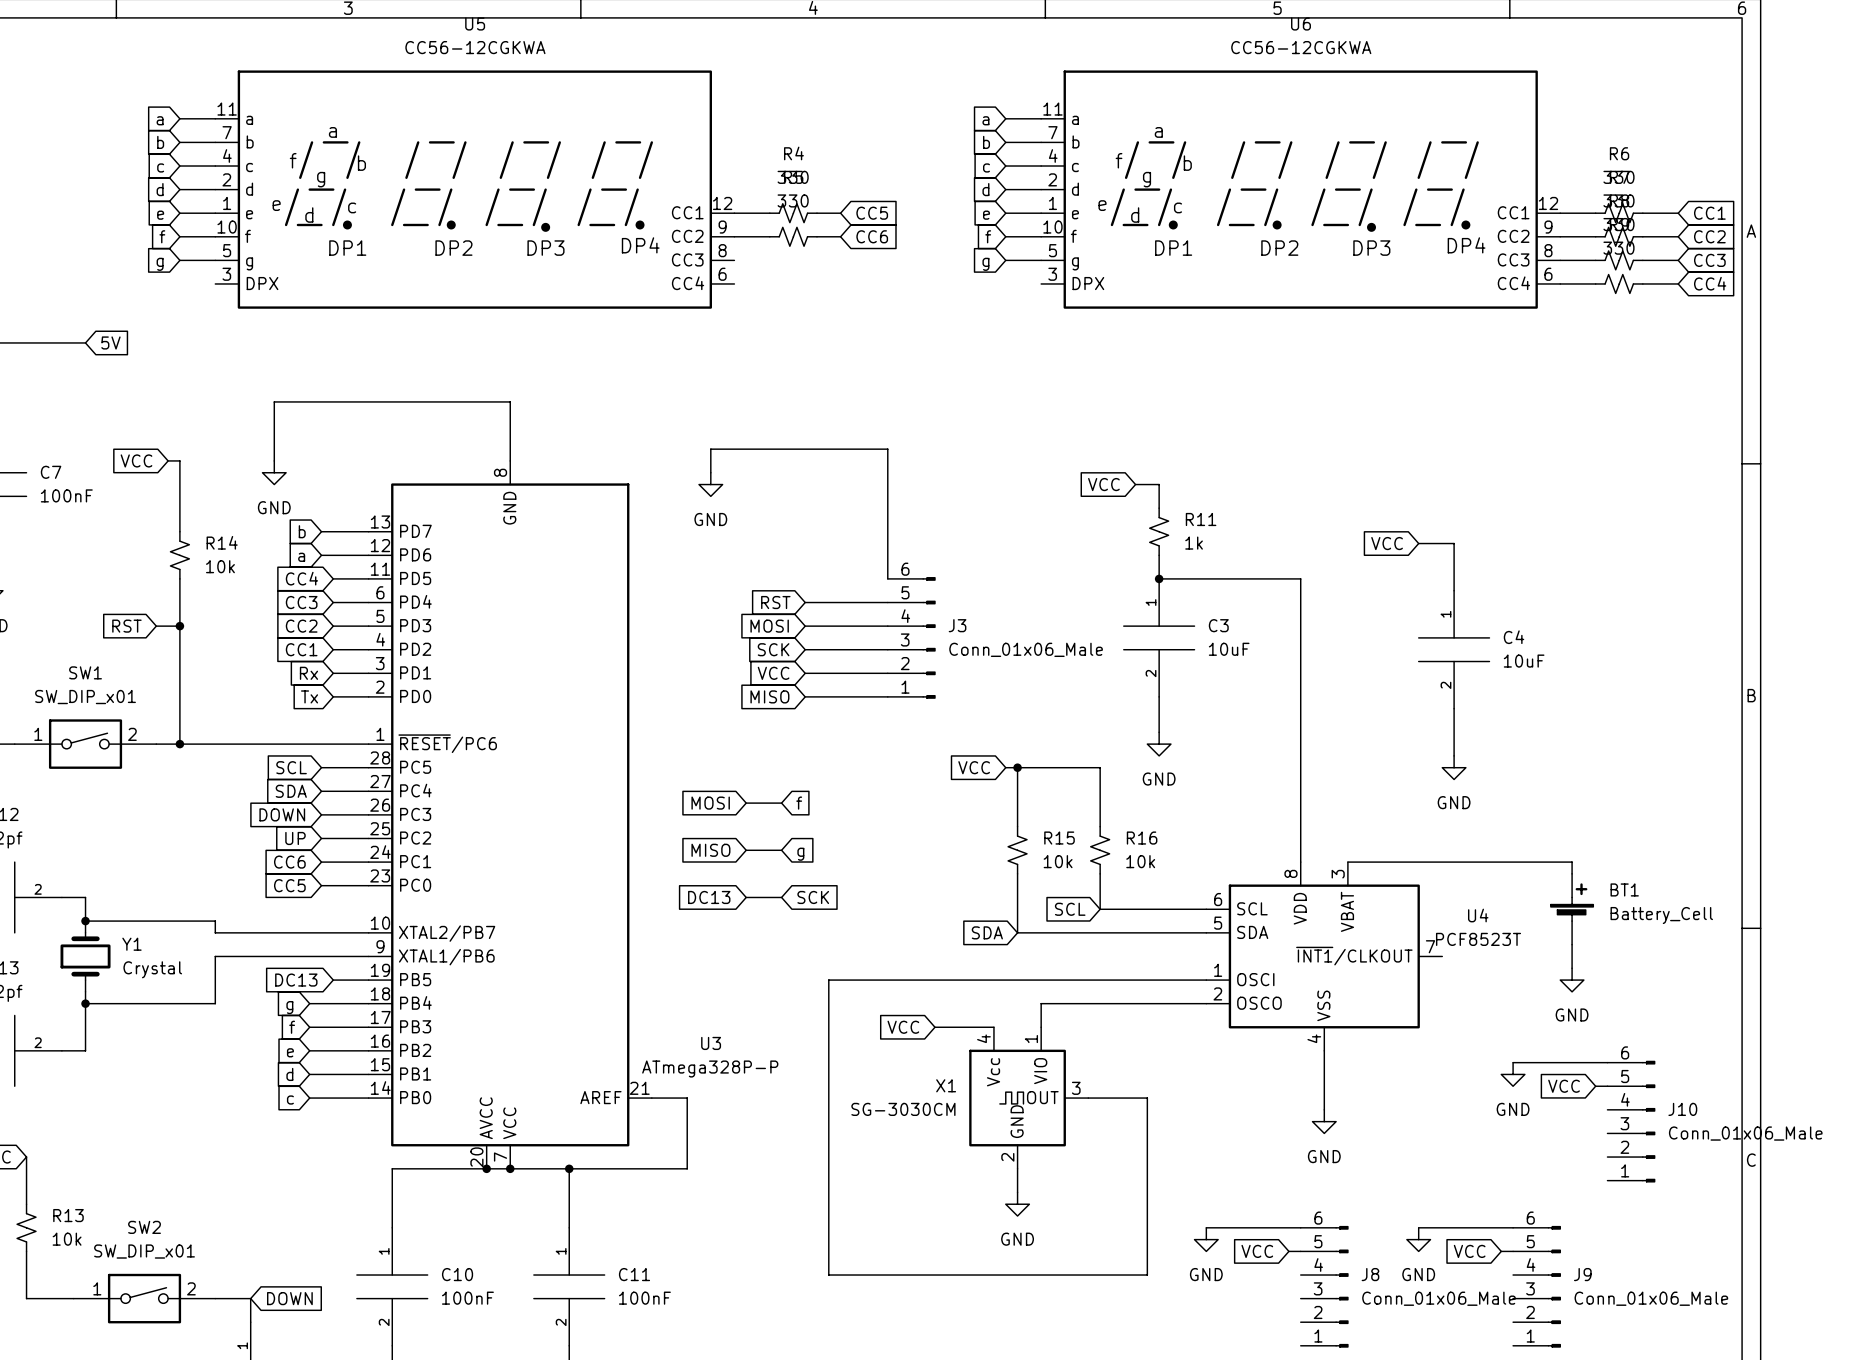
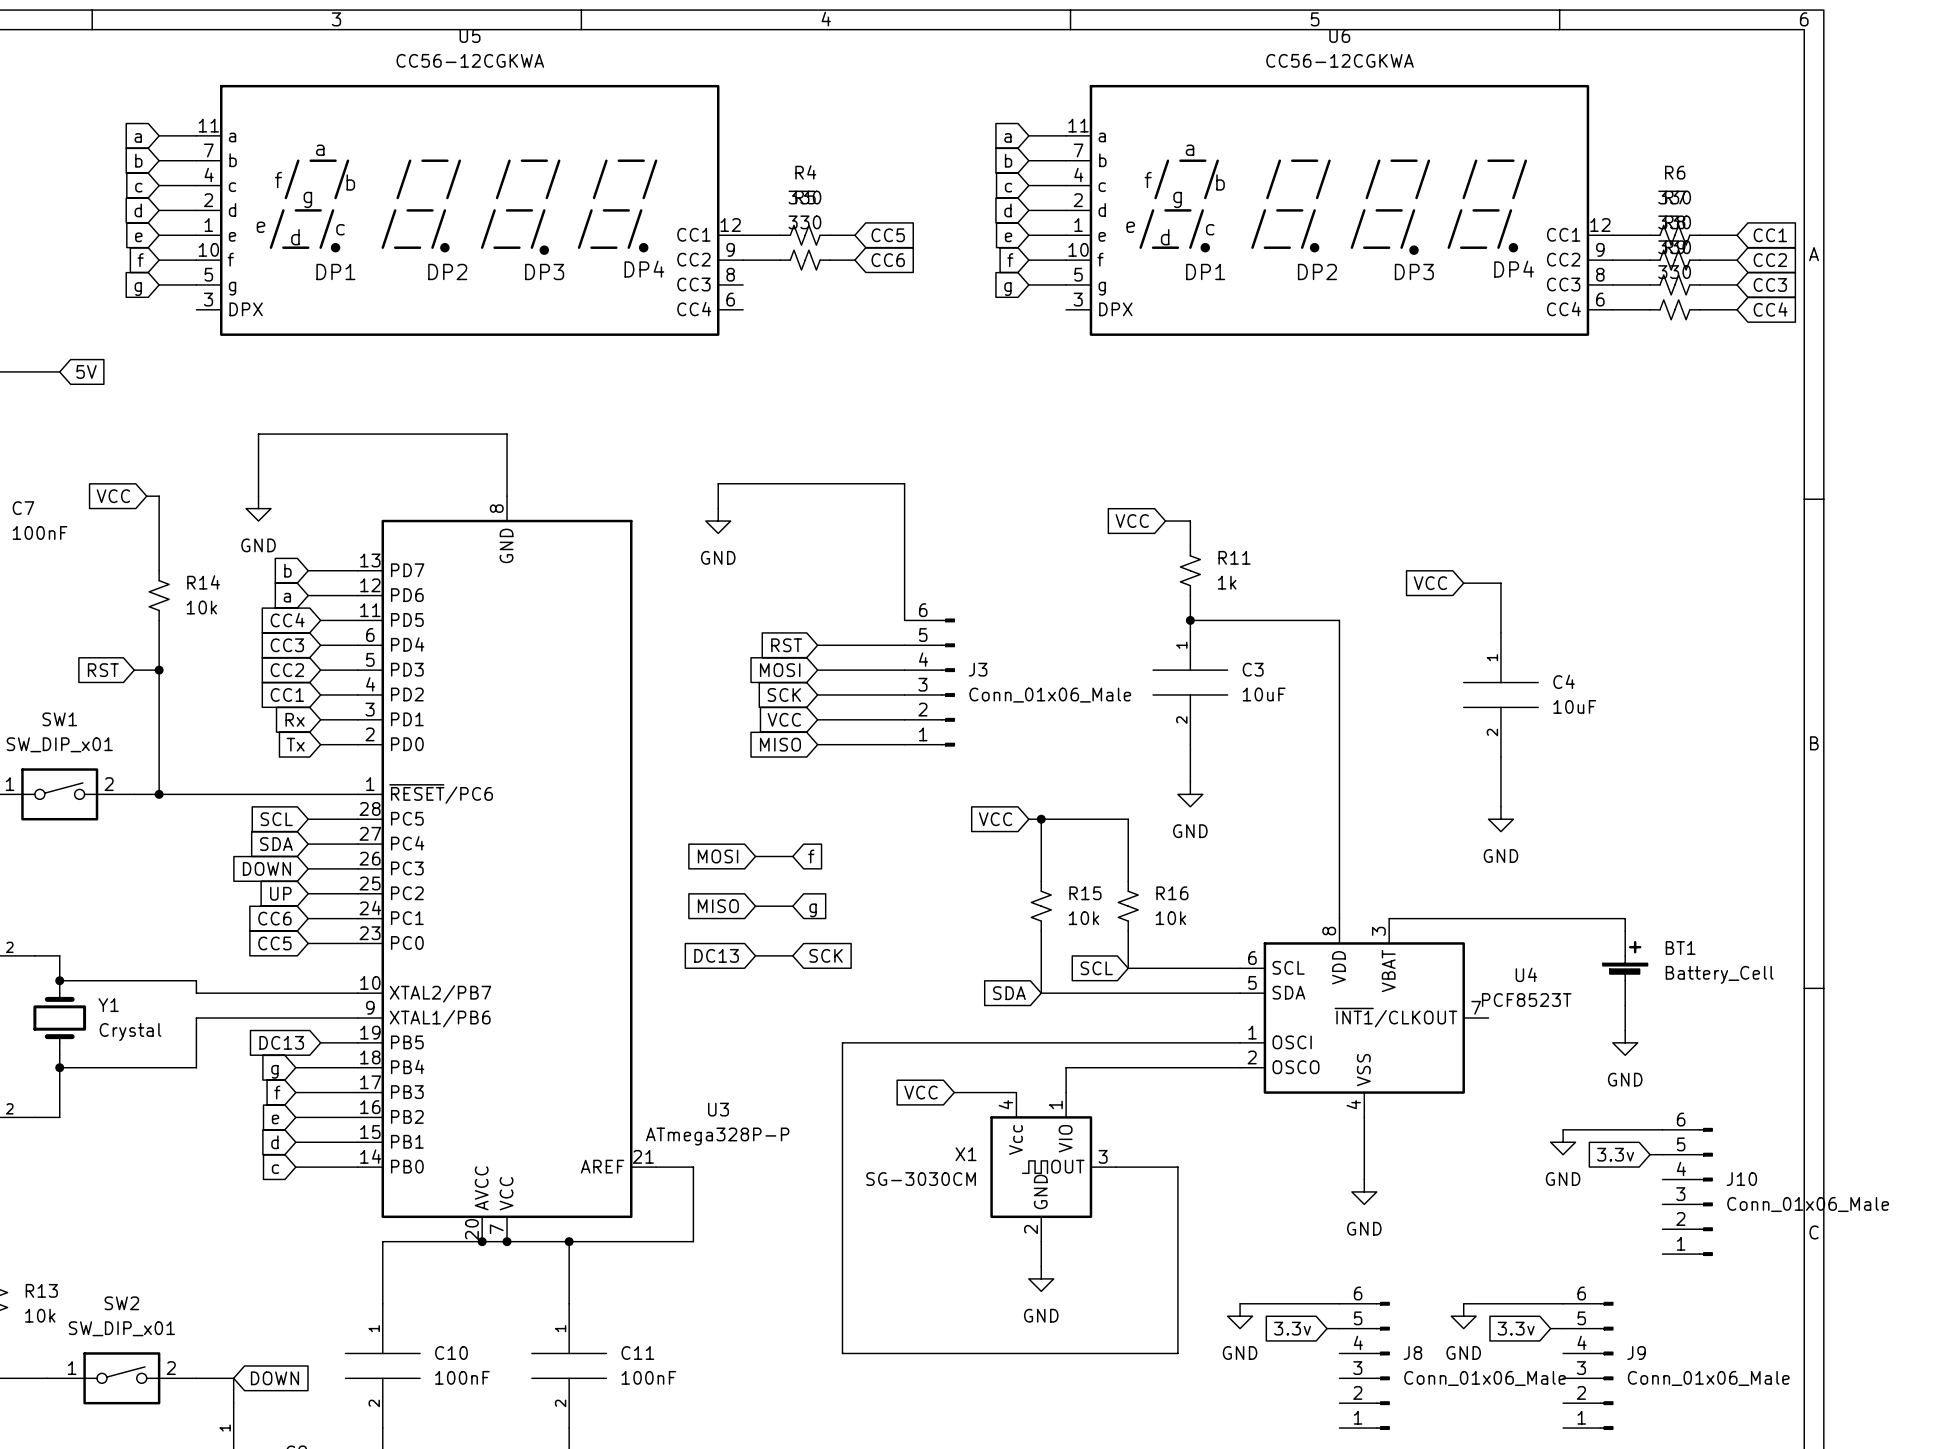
global label: VCC (1564, 1086) -> 3.3v (1615, 1154)
global label: VCC (1257, 1251) -> 3.3v (1292, 1328)
global label: VCC (1469, 1251) -> 3.3v (1516, 1328)

